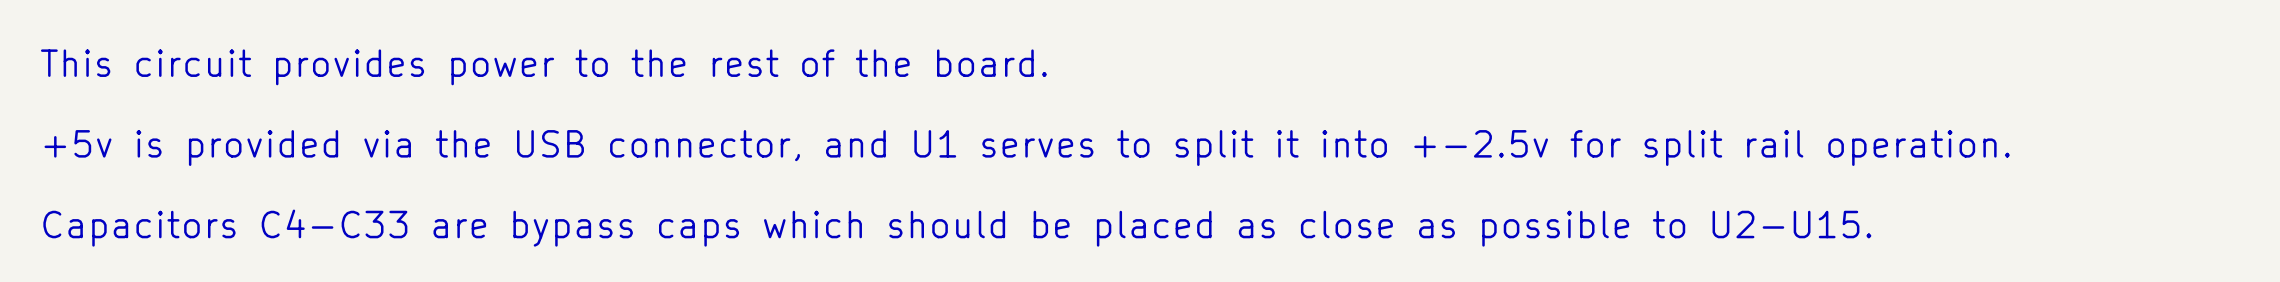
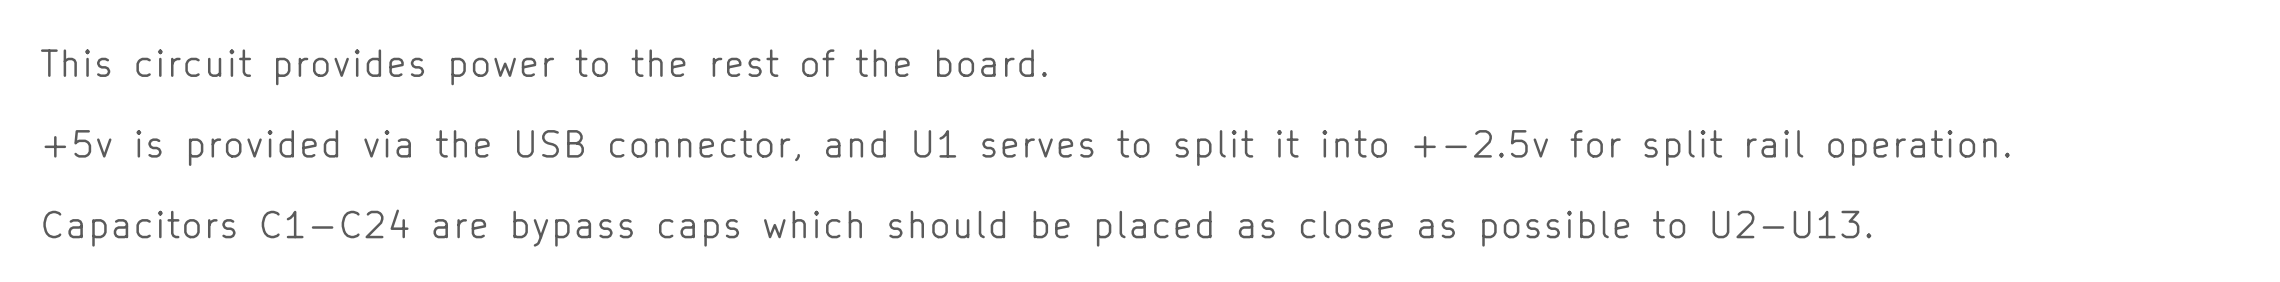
text: Capacitors C4-C33 are bypass caps which should be placed as close as possible to U2-U15. (957, 228) -> Capacitors C1-C24 are bypass caps which should be placed as close as possible to U2-U13. (957, 228)

